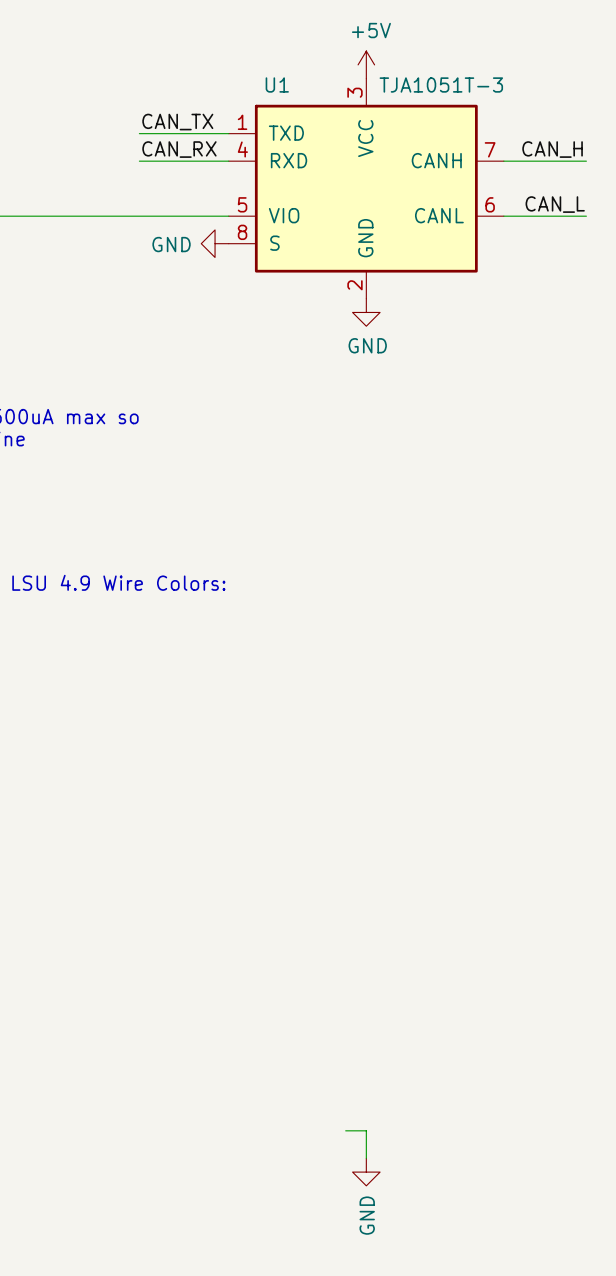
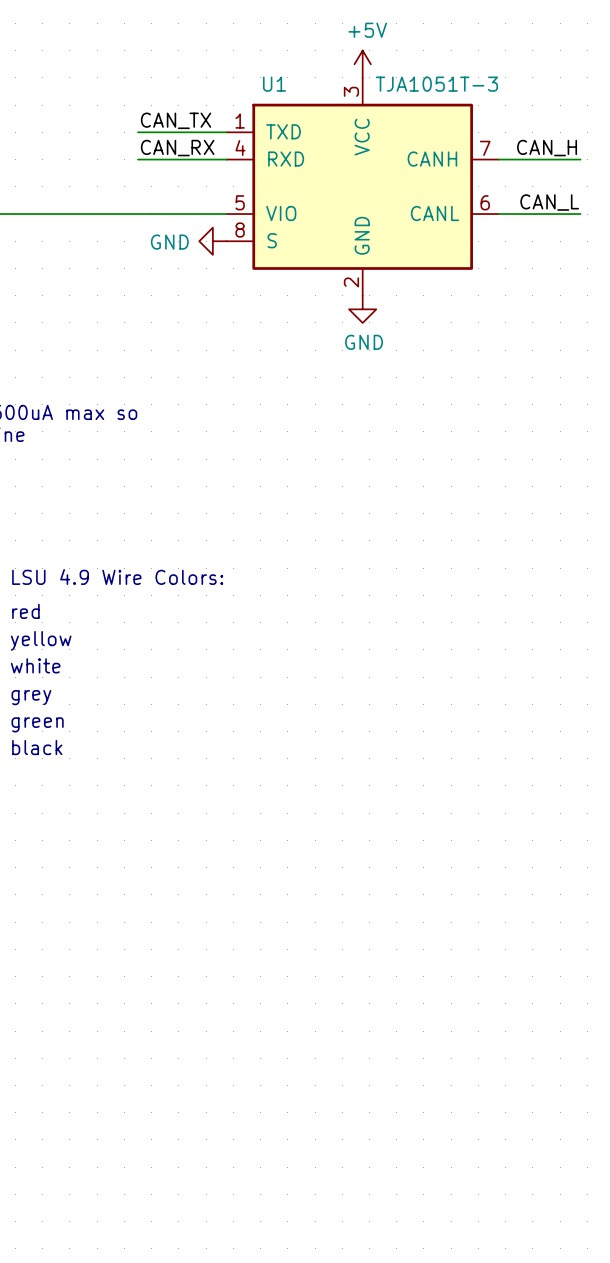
text: none -> red (25, 611)
text: none -> yellow (41, 640)
text: none -> white (35, 665)
text: none -> grey (31, 697)
text: none -> green (37, 724)
text: none -> black (37, 747)
wire: (345, 1130) (366, 1130) (366, 1158) -> none
power symbol: GND (366, 1172) -> none

